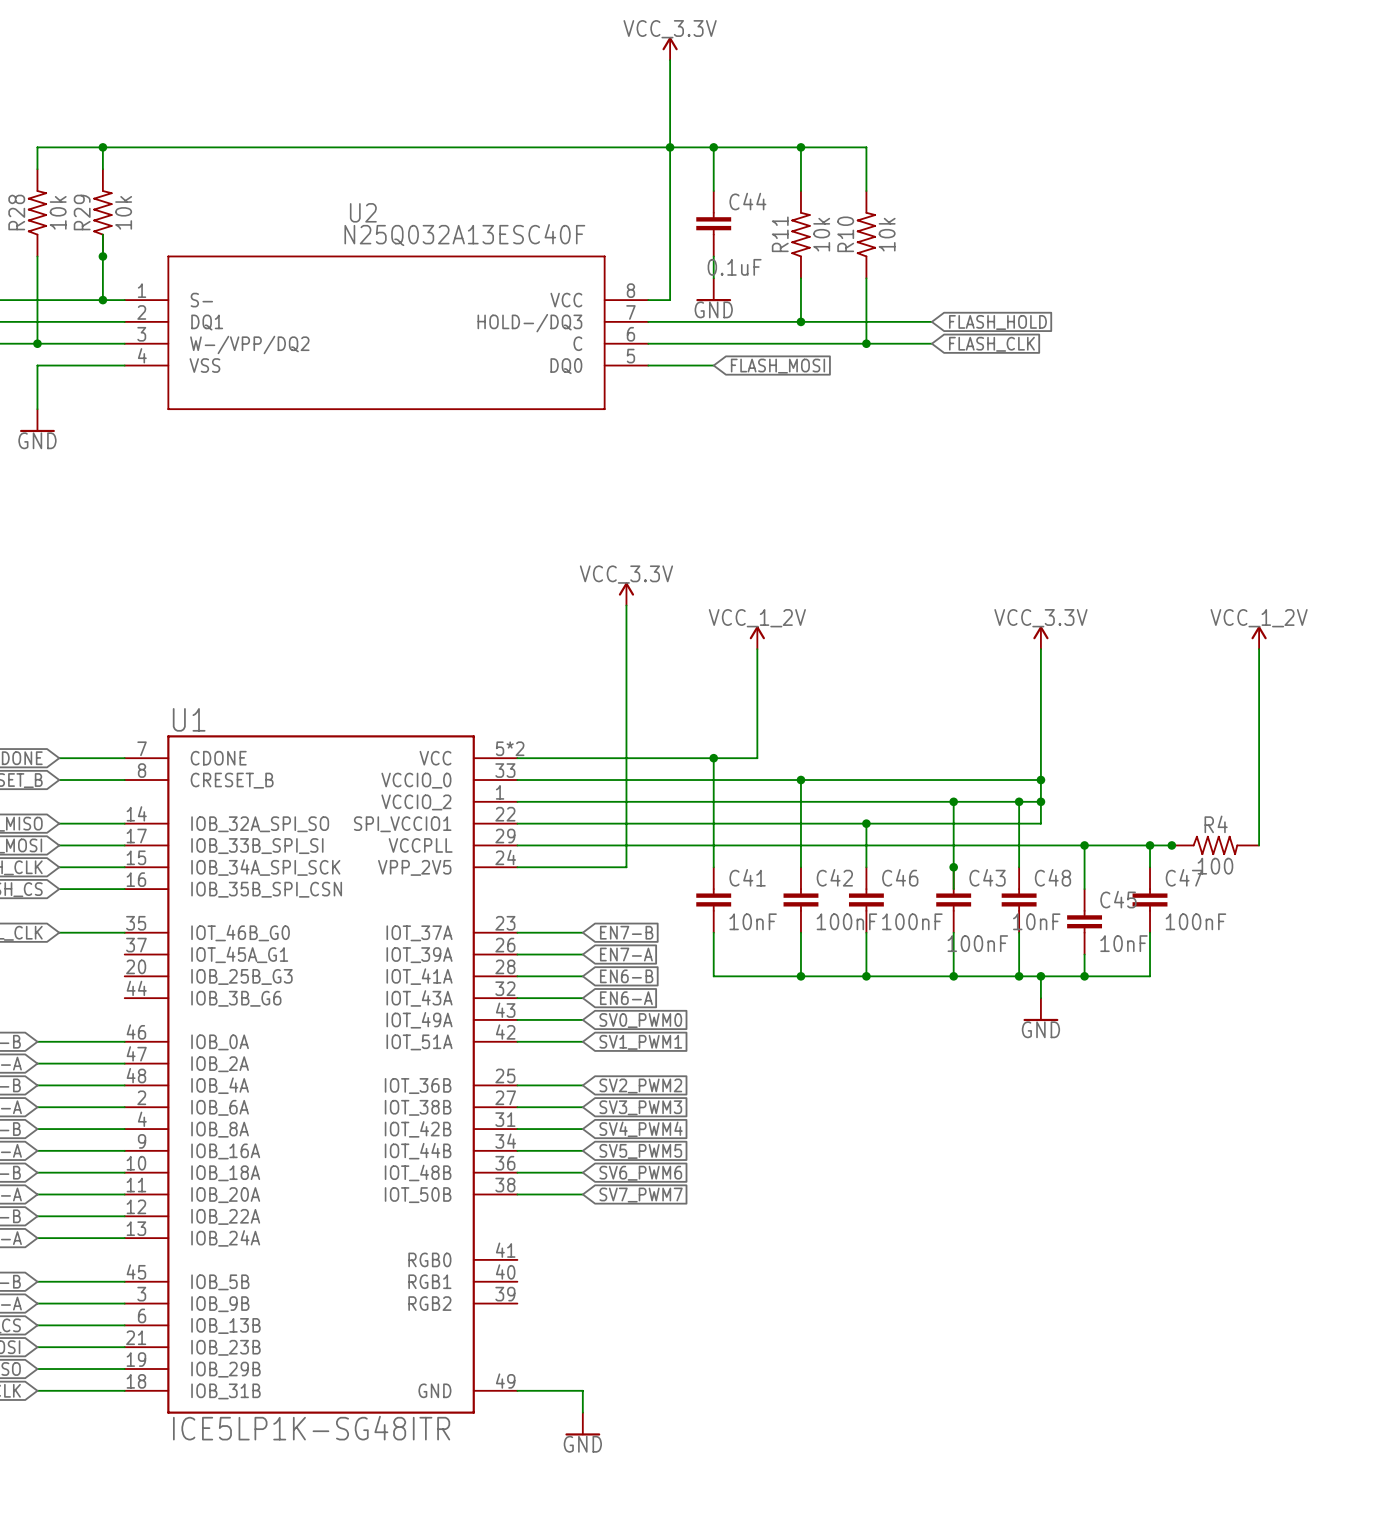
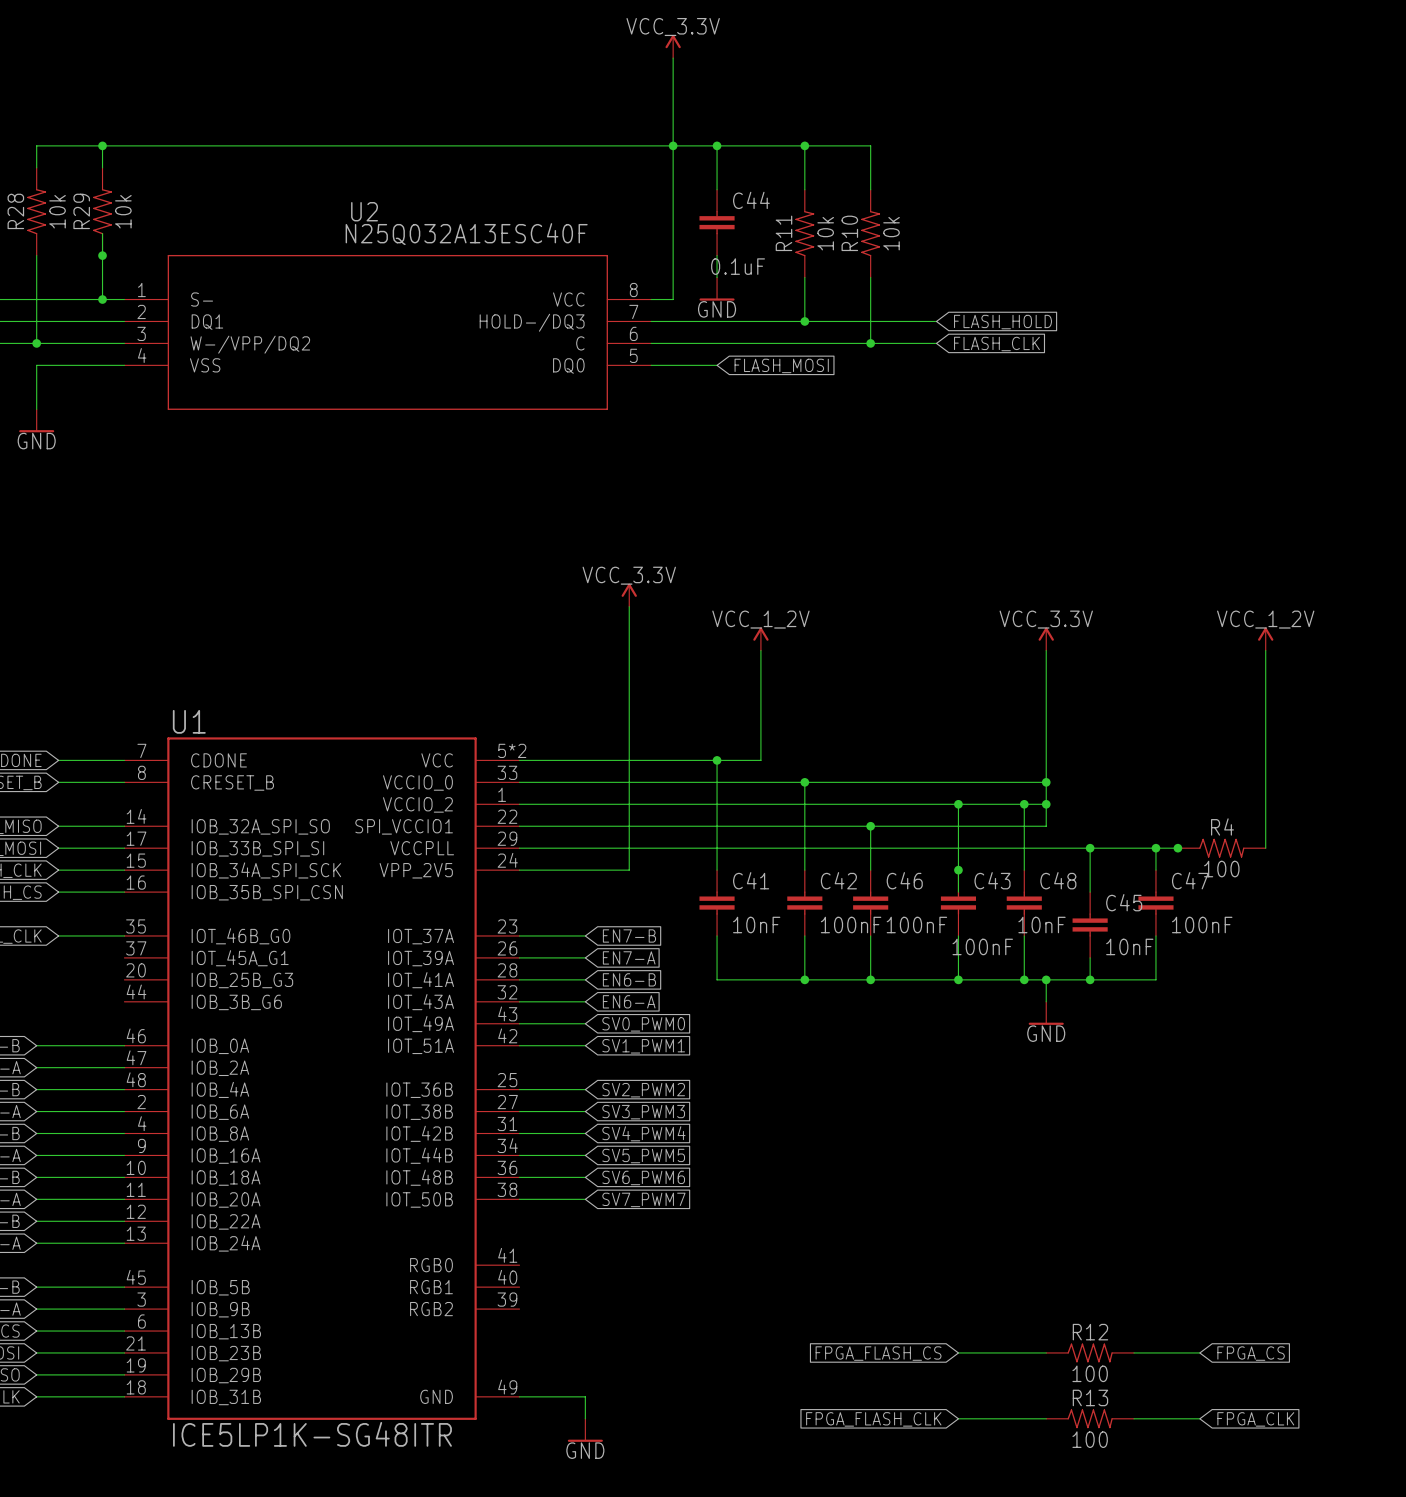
global label: none -> FPGA_FLASH_CS (878, 1353)
wire: none -> (958, 1352) (1046, 1352)
R12: none -> 100 (1090, 1352)
wire: none -> (1134, 1352) (1199, 1352)
global label: none -> FPGA_CS (1251, 1353)
wire: none -> (958, 1418) (1046, 1418)
R13: none -> 100 (1090, 1418)
wire: none -> (1134, 1418) (1199, 1418)
global label: none -> FPGA_FLASH_CLK (873, 1419)
global label: none -> FPGA_CLK (1255, 1419)

